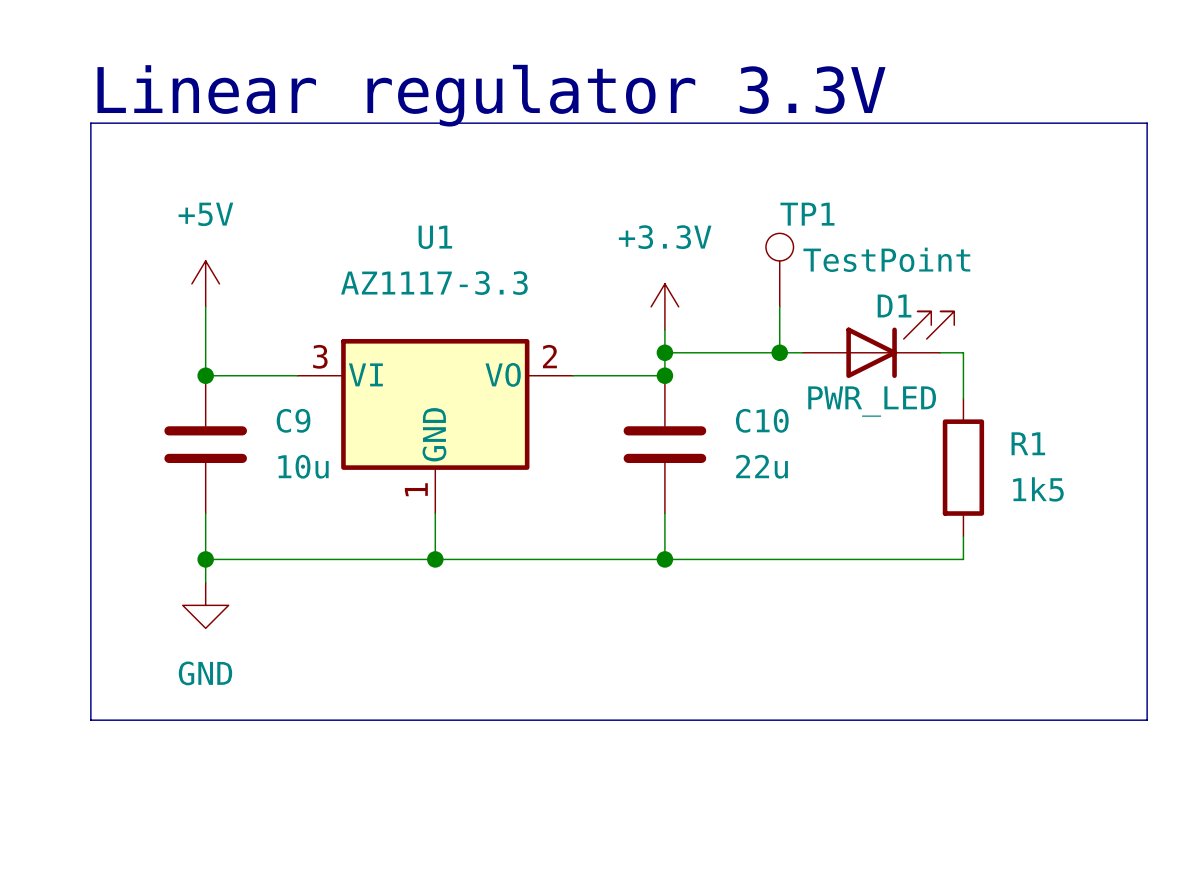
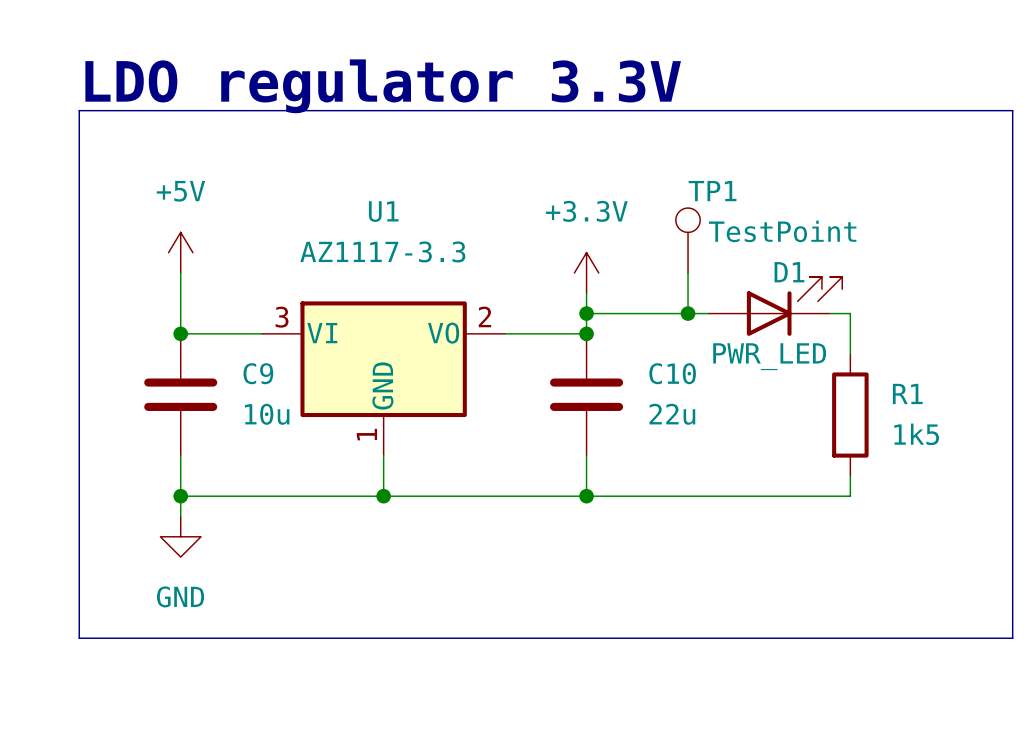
text: Linear regulator 3.3V (491, 95) -> LDO regulator 3.3V (383, 86)

